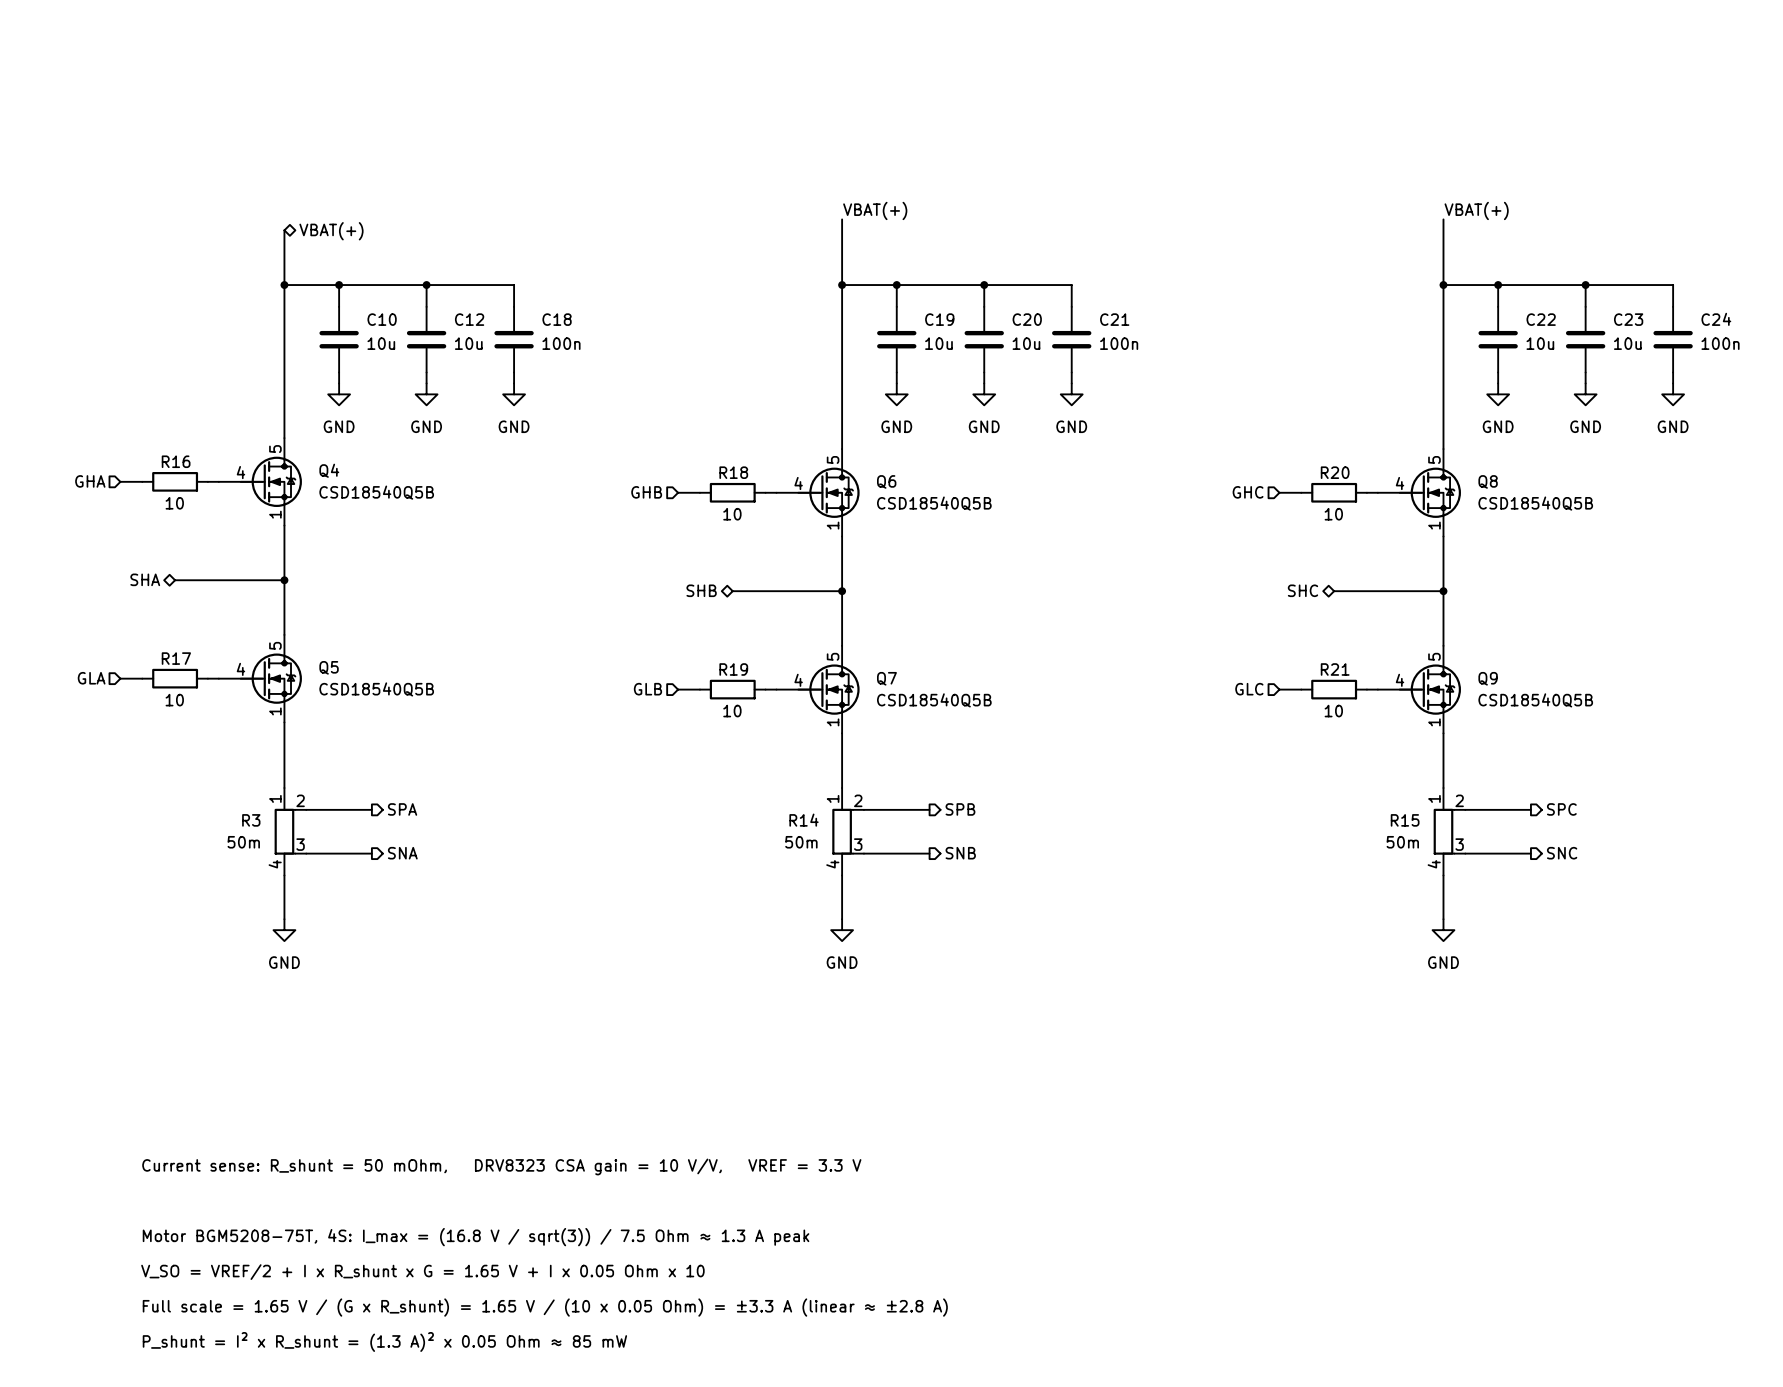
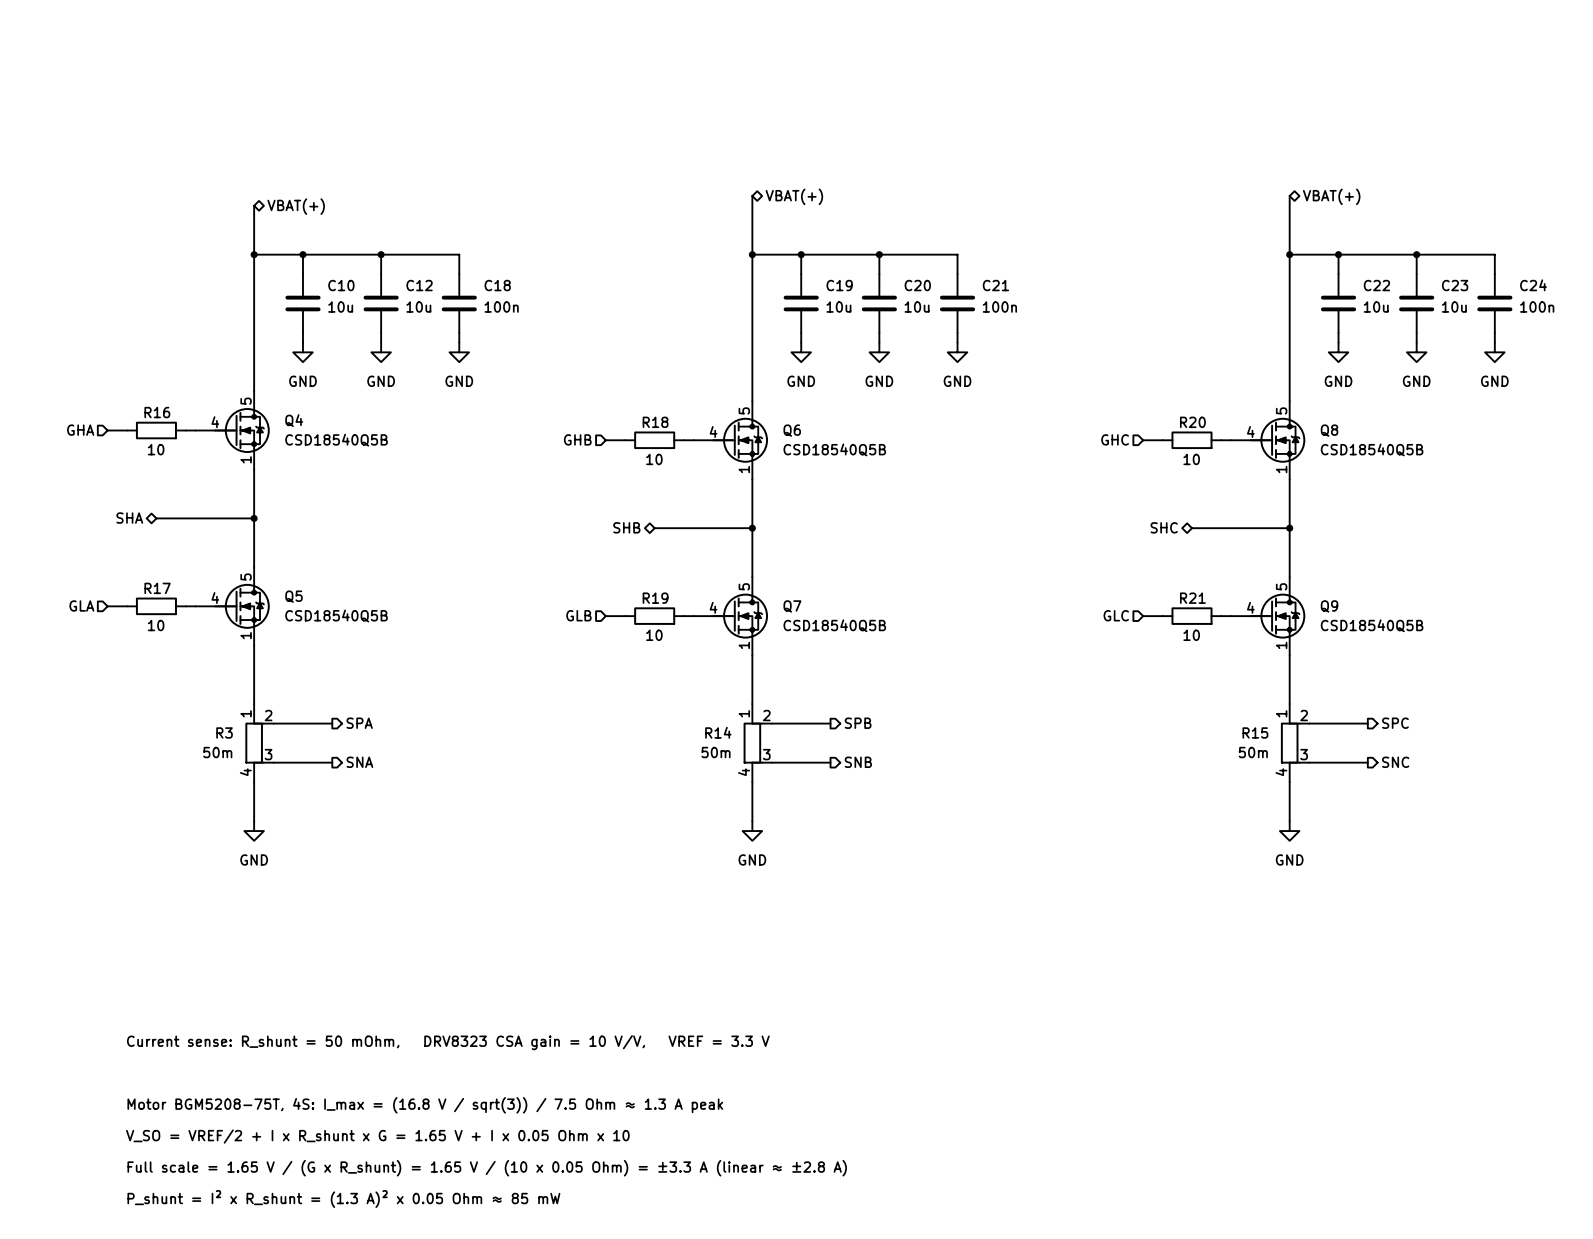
label: VBAT(+) (875, 210) -> none
label: VBAT(+) (1476, 210) -> none
hierarchical label: none -> VBAT(+) (794, 196)
hierarchical label: none -> VBAT(+) (1331, 196)

